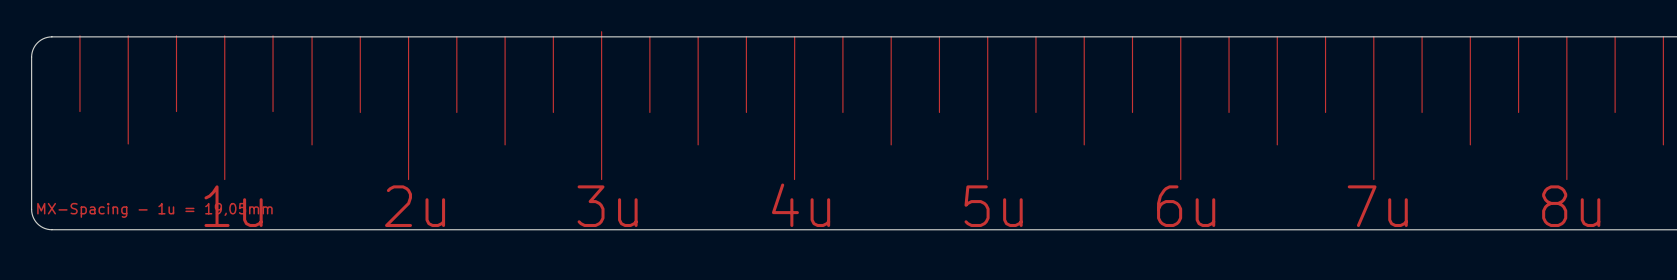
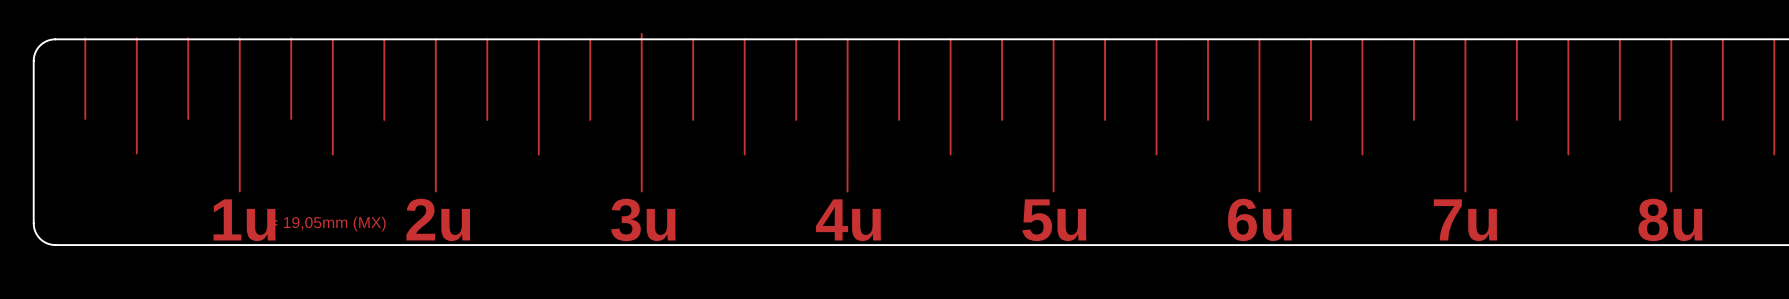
text: none -> = 19,05mm (MX) (327, 223)
text: MX-Spacing - 1u = 19,05mm (154, 210) -> none

